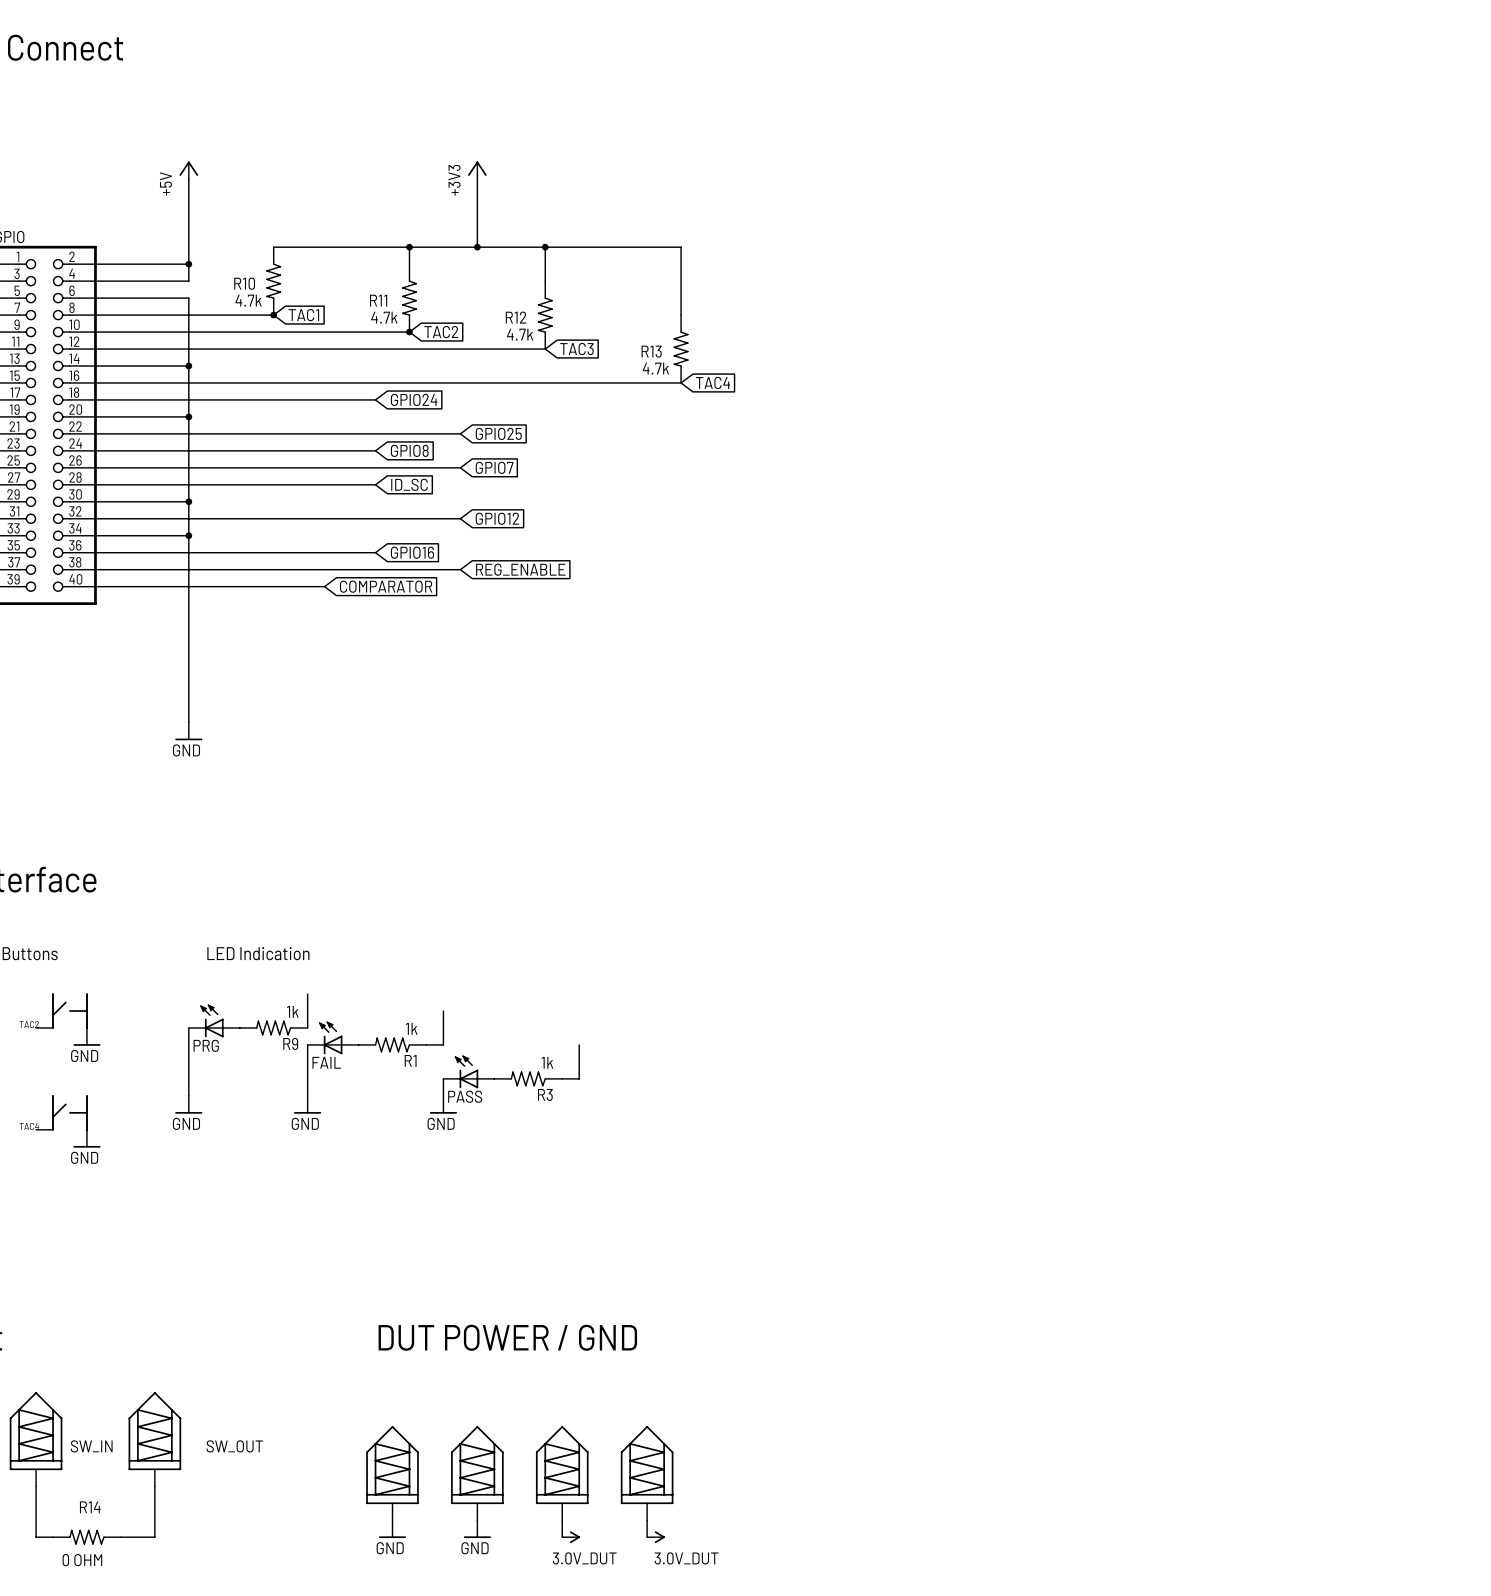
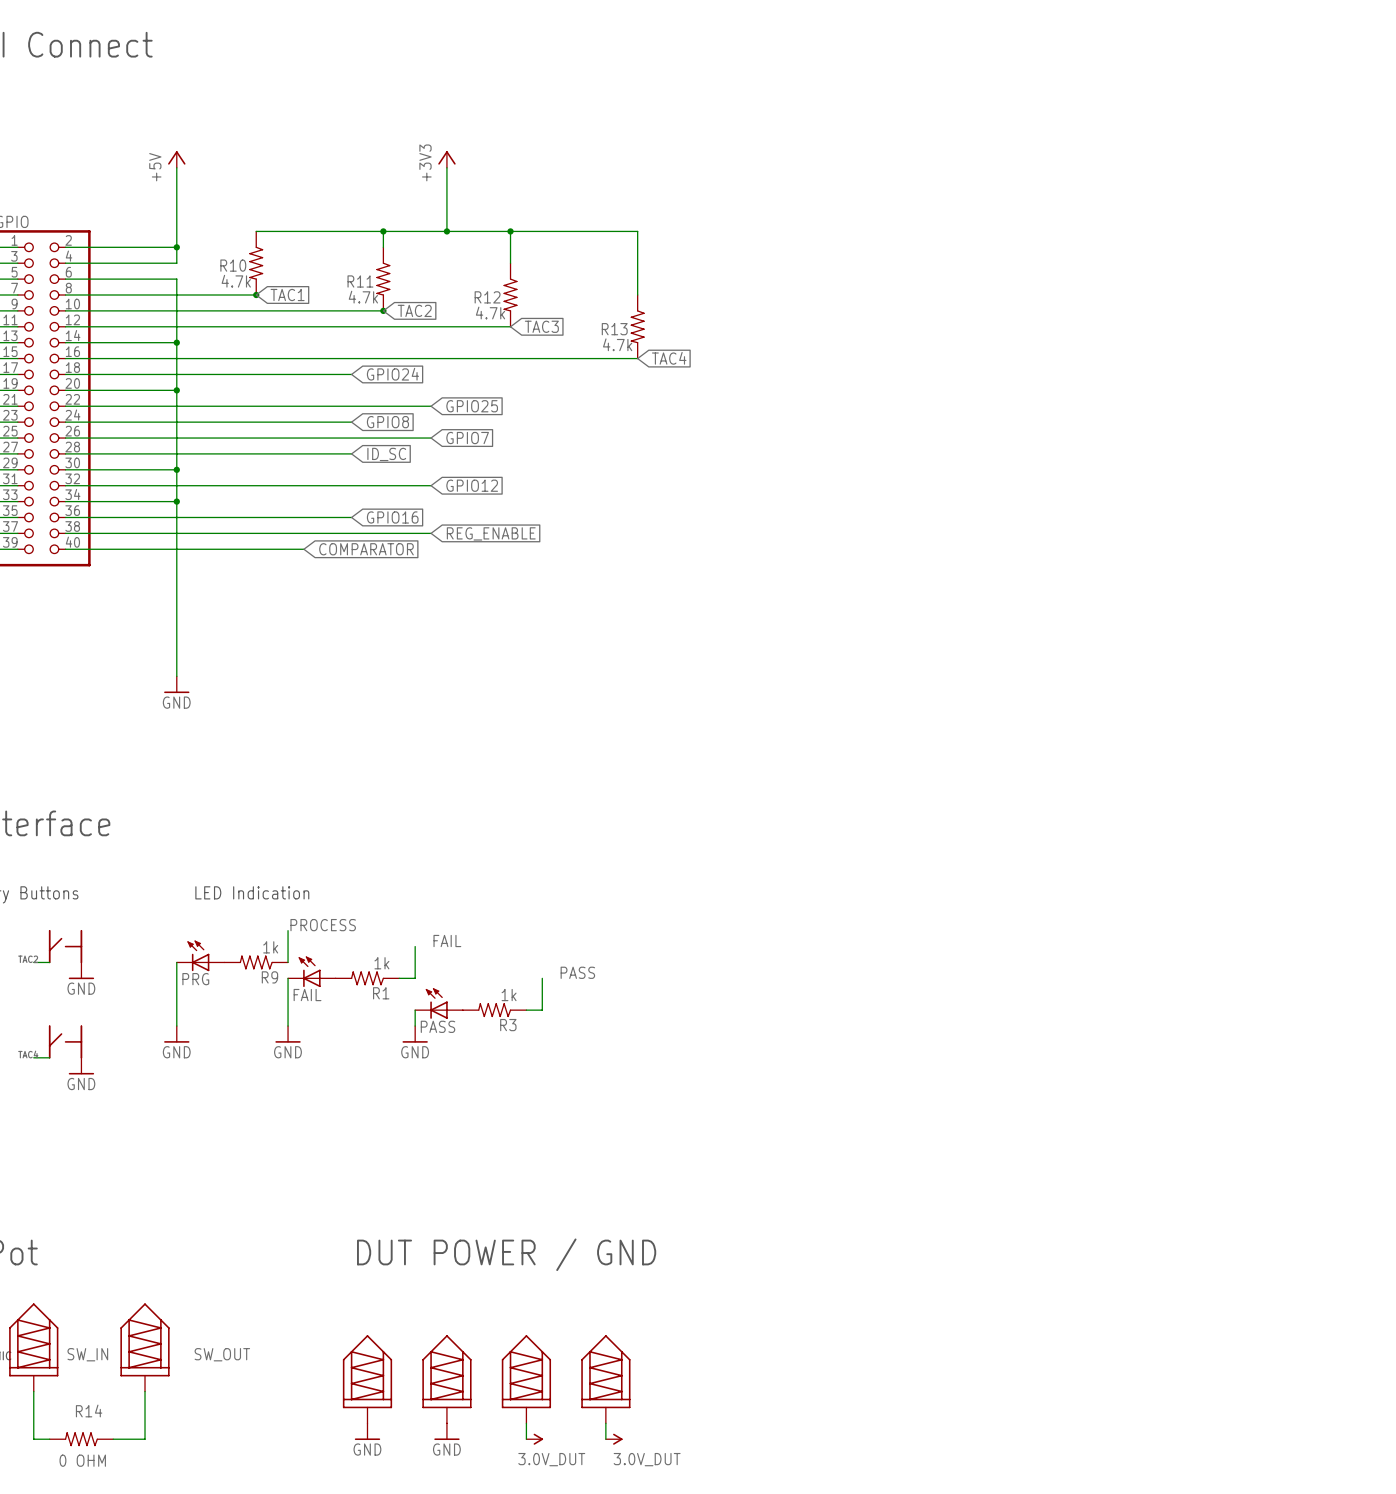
label: none -> PROCESS (323, 925)
label: none -> FAIL (447, 941)
label: none -> PASS (577, 972)

